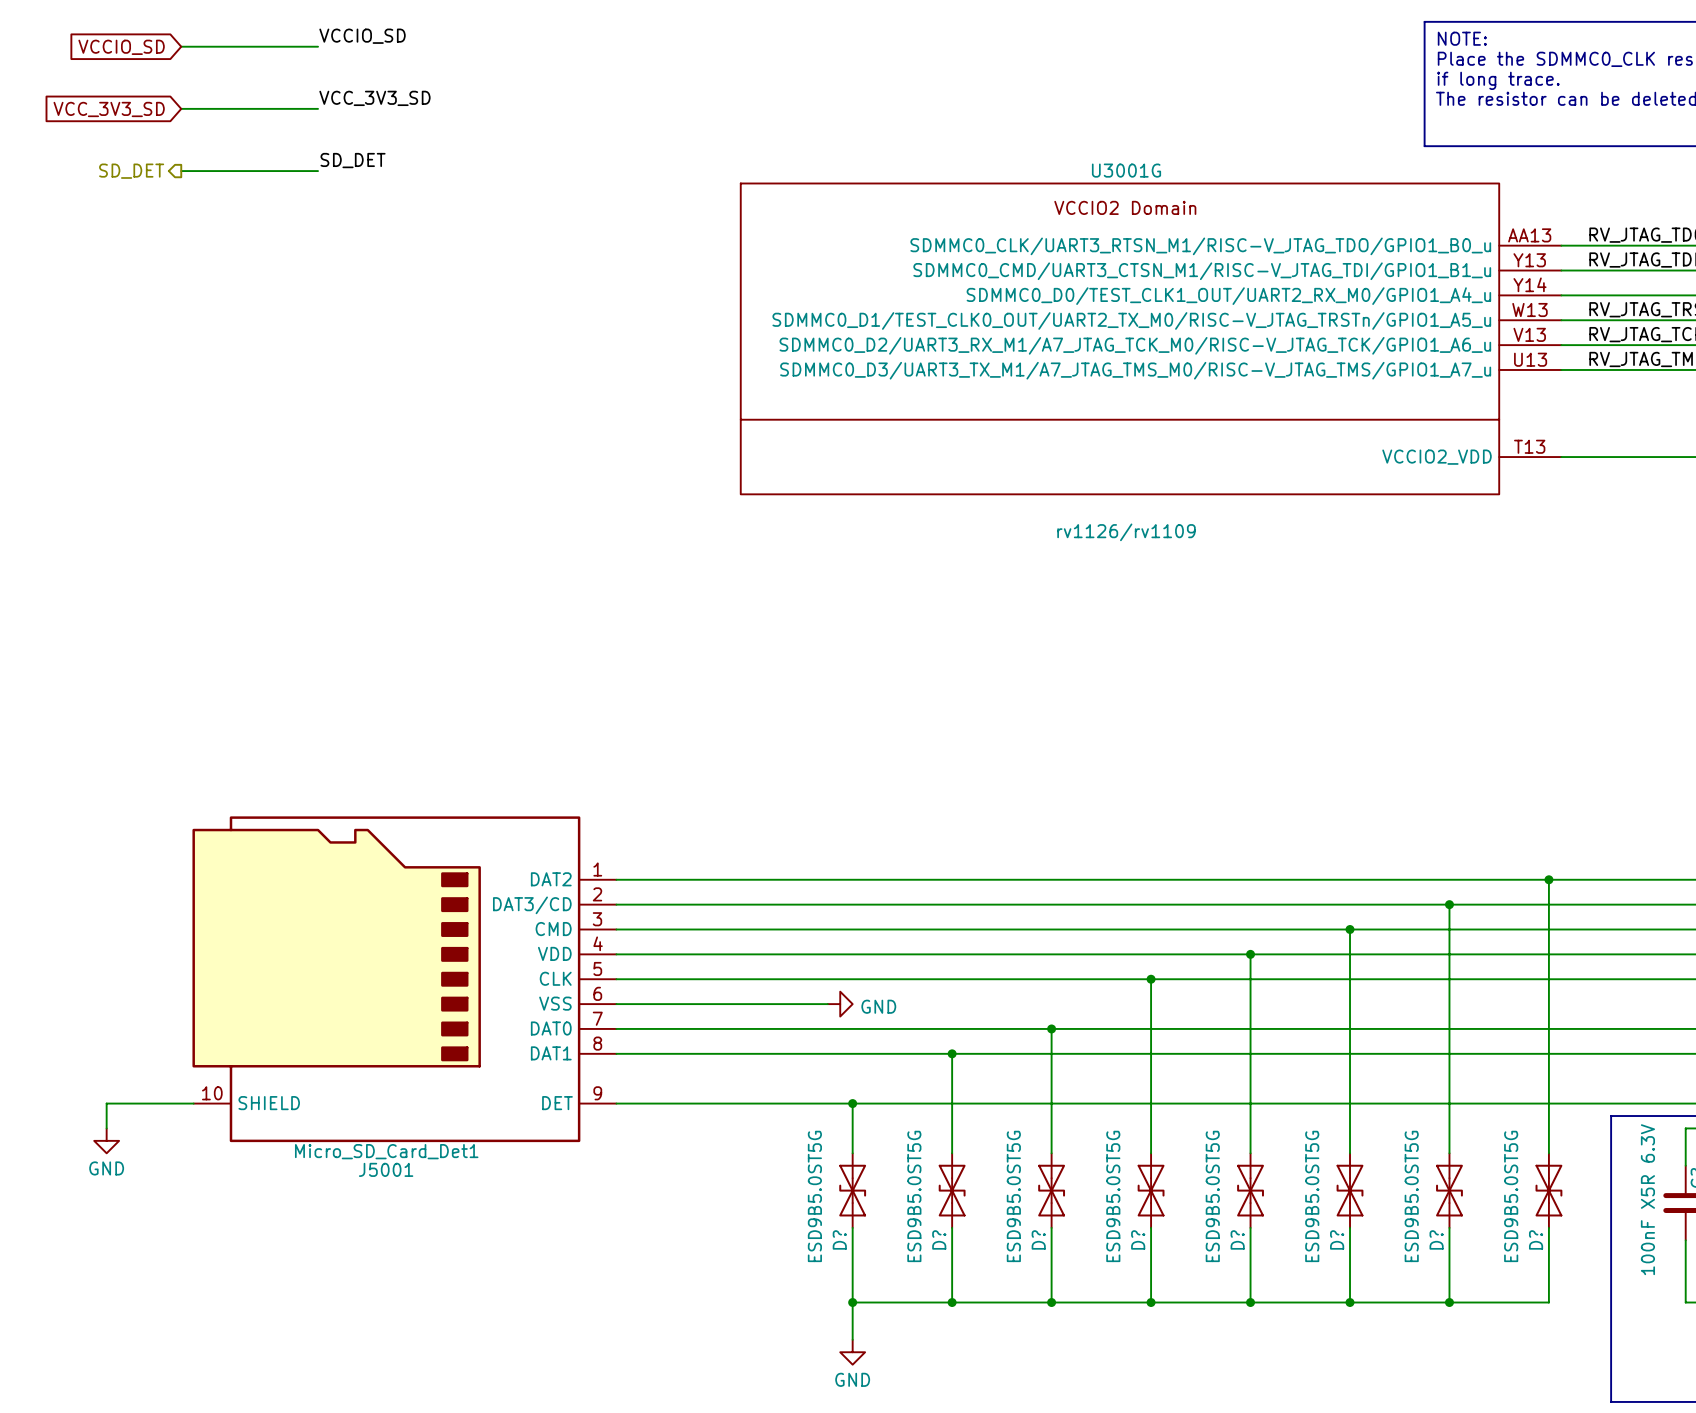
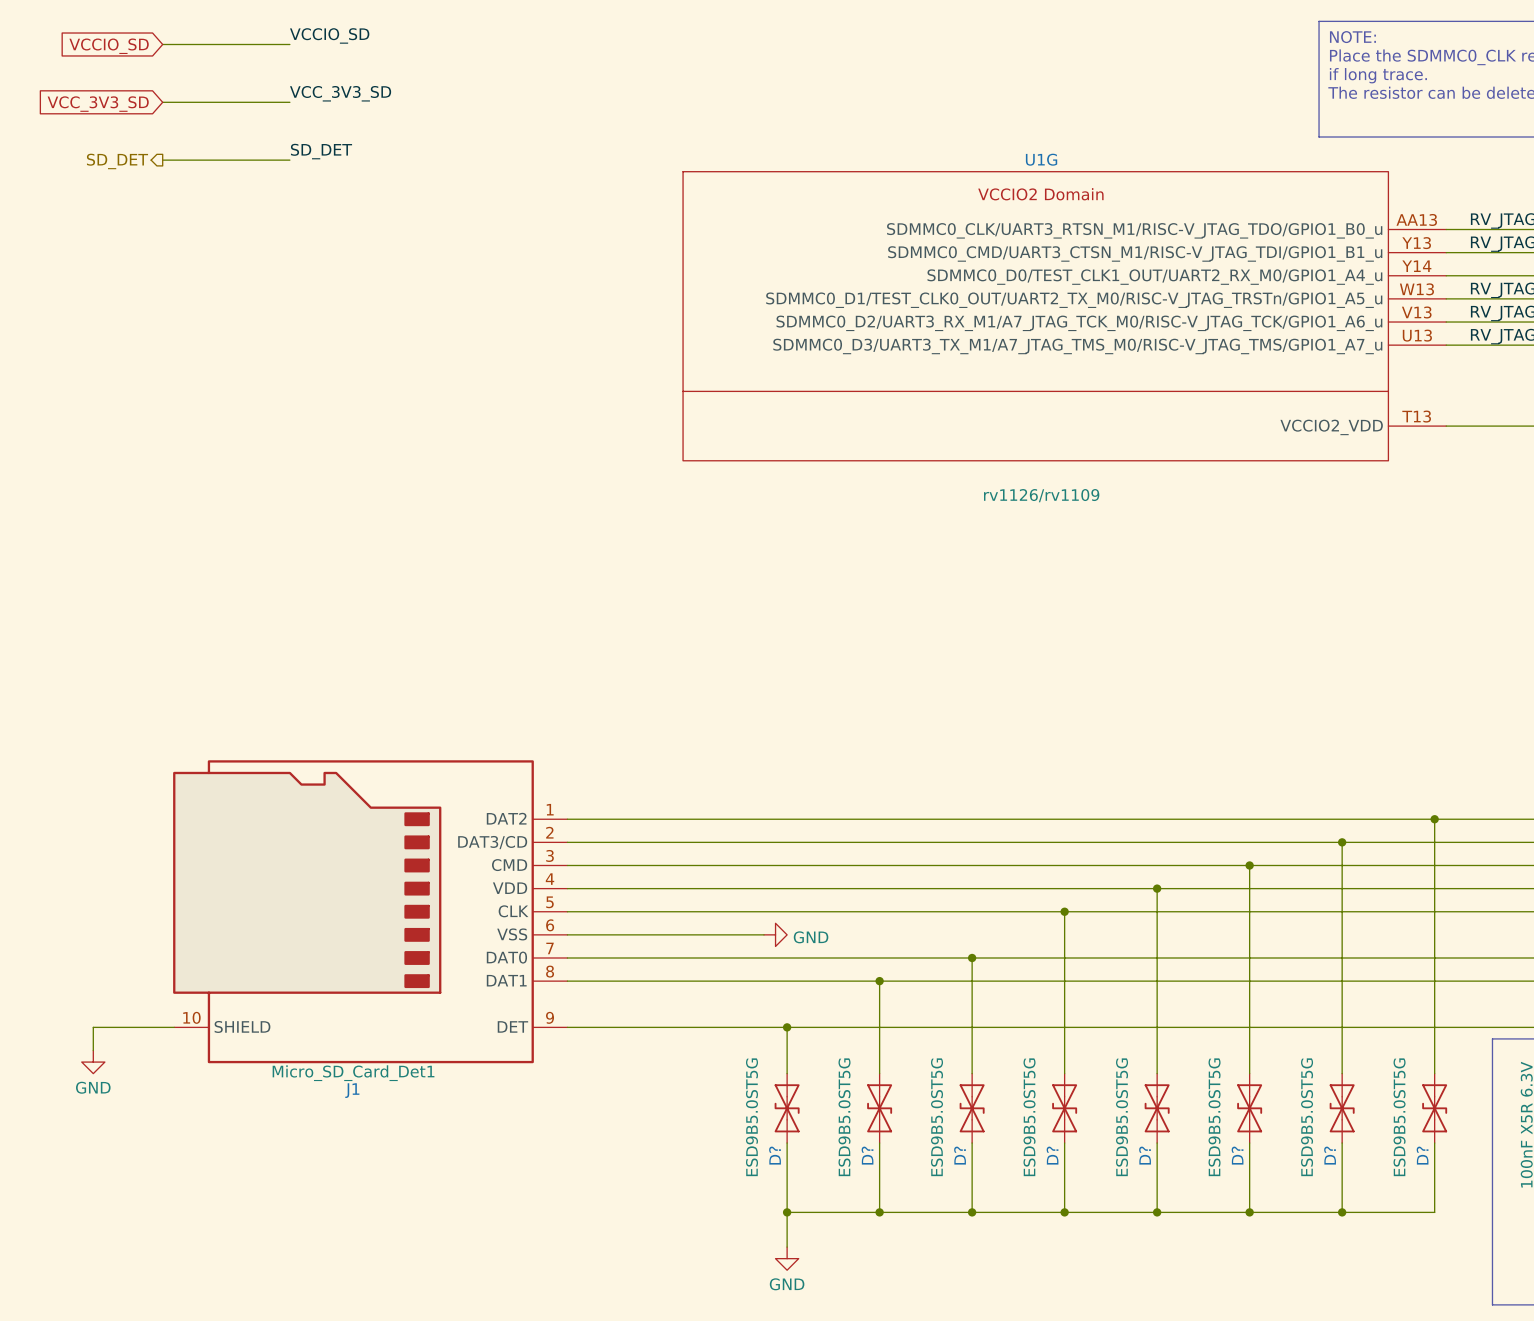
U3001G name: U3001G (1126, 170) -> U1G (1041, 159)
J5001 name: J5001 (386, 1169) -> J1 (352, 1090)

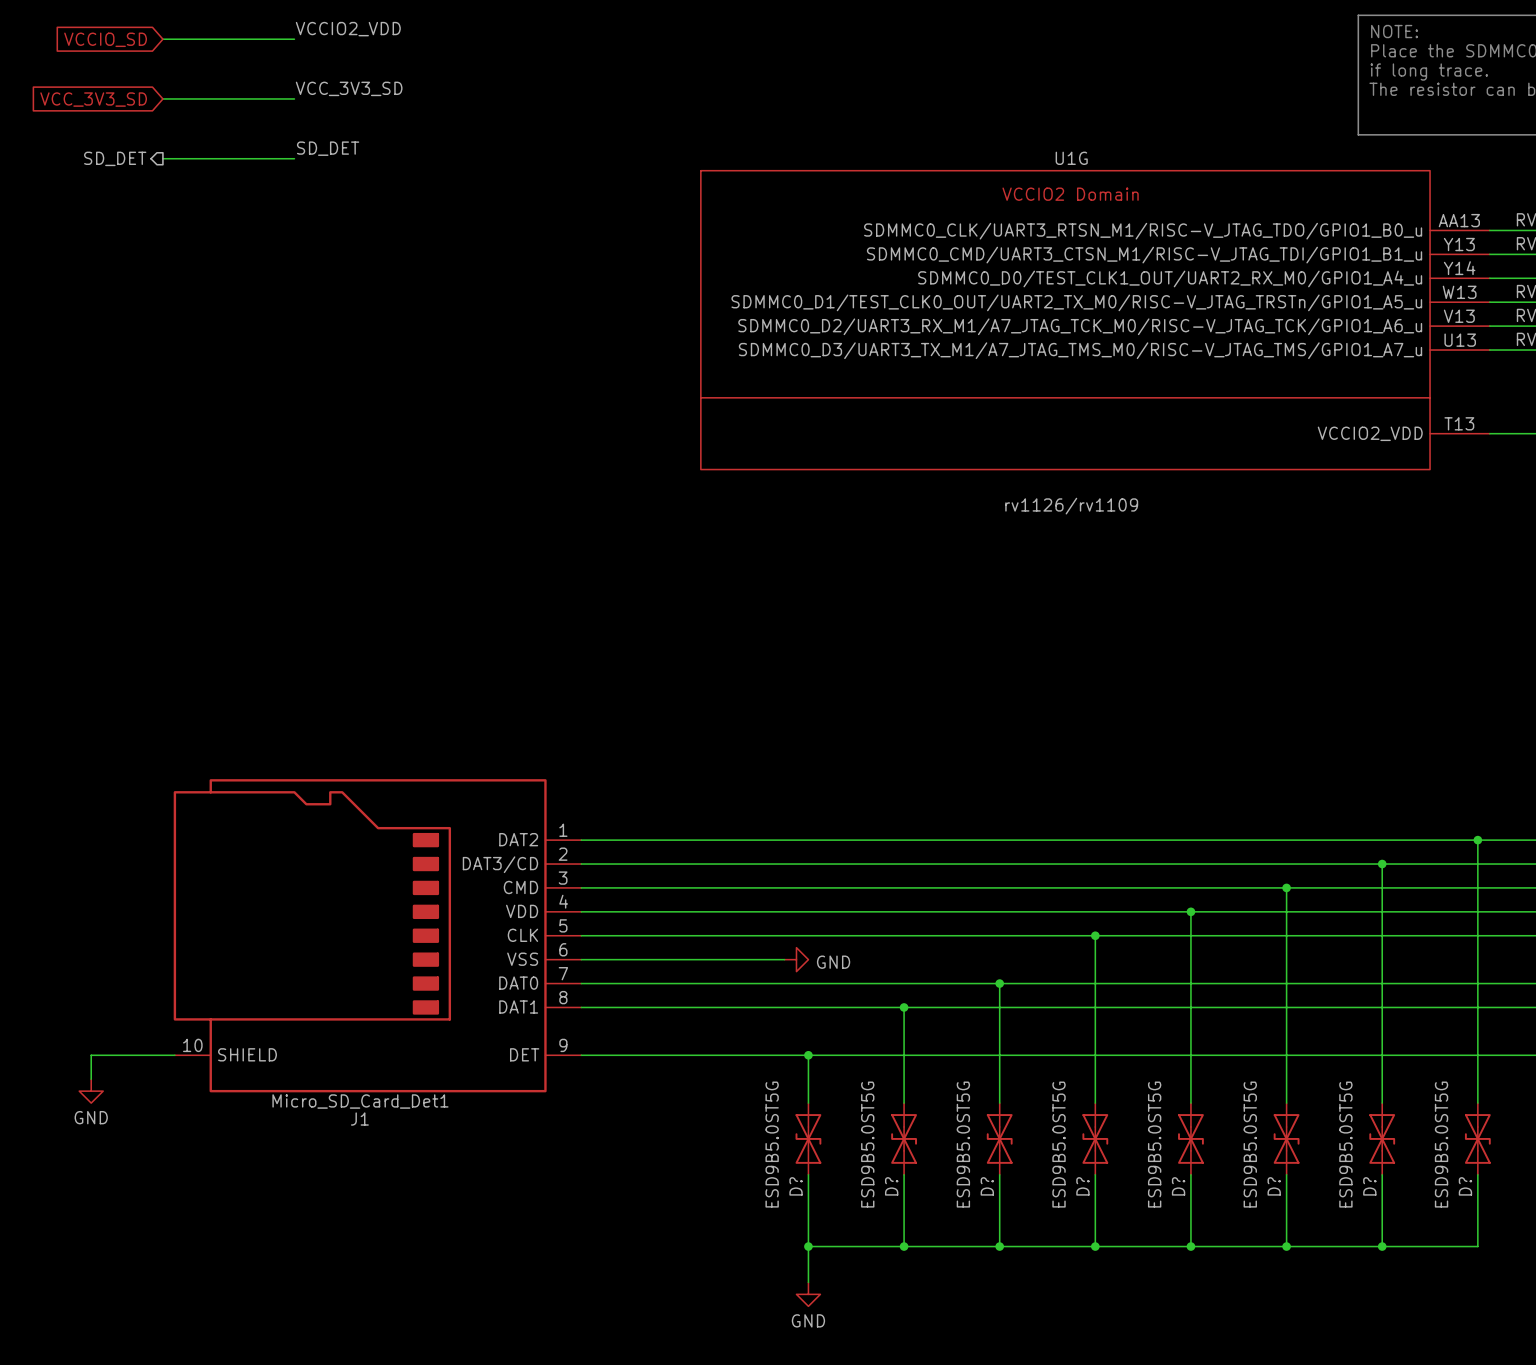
label: VCCIO_SD (329, 35) -> VCCIO2_VDD (348, 29)

